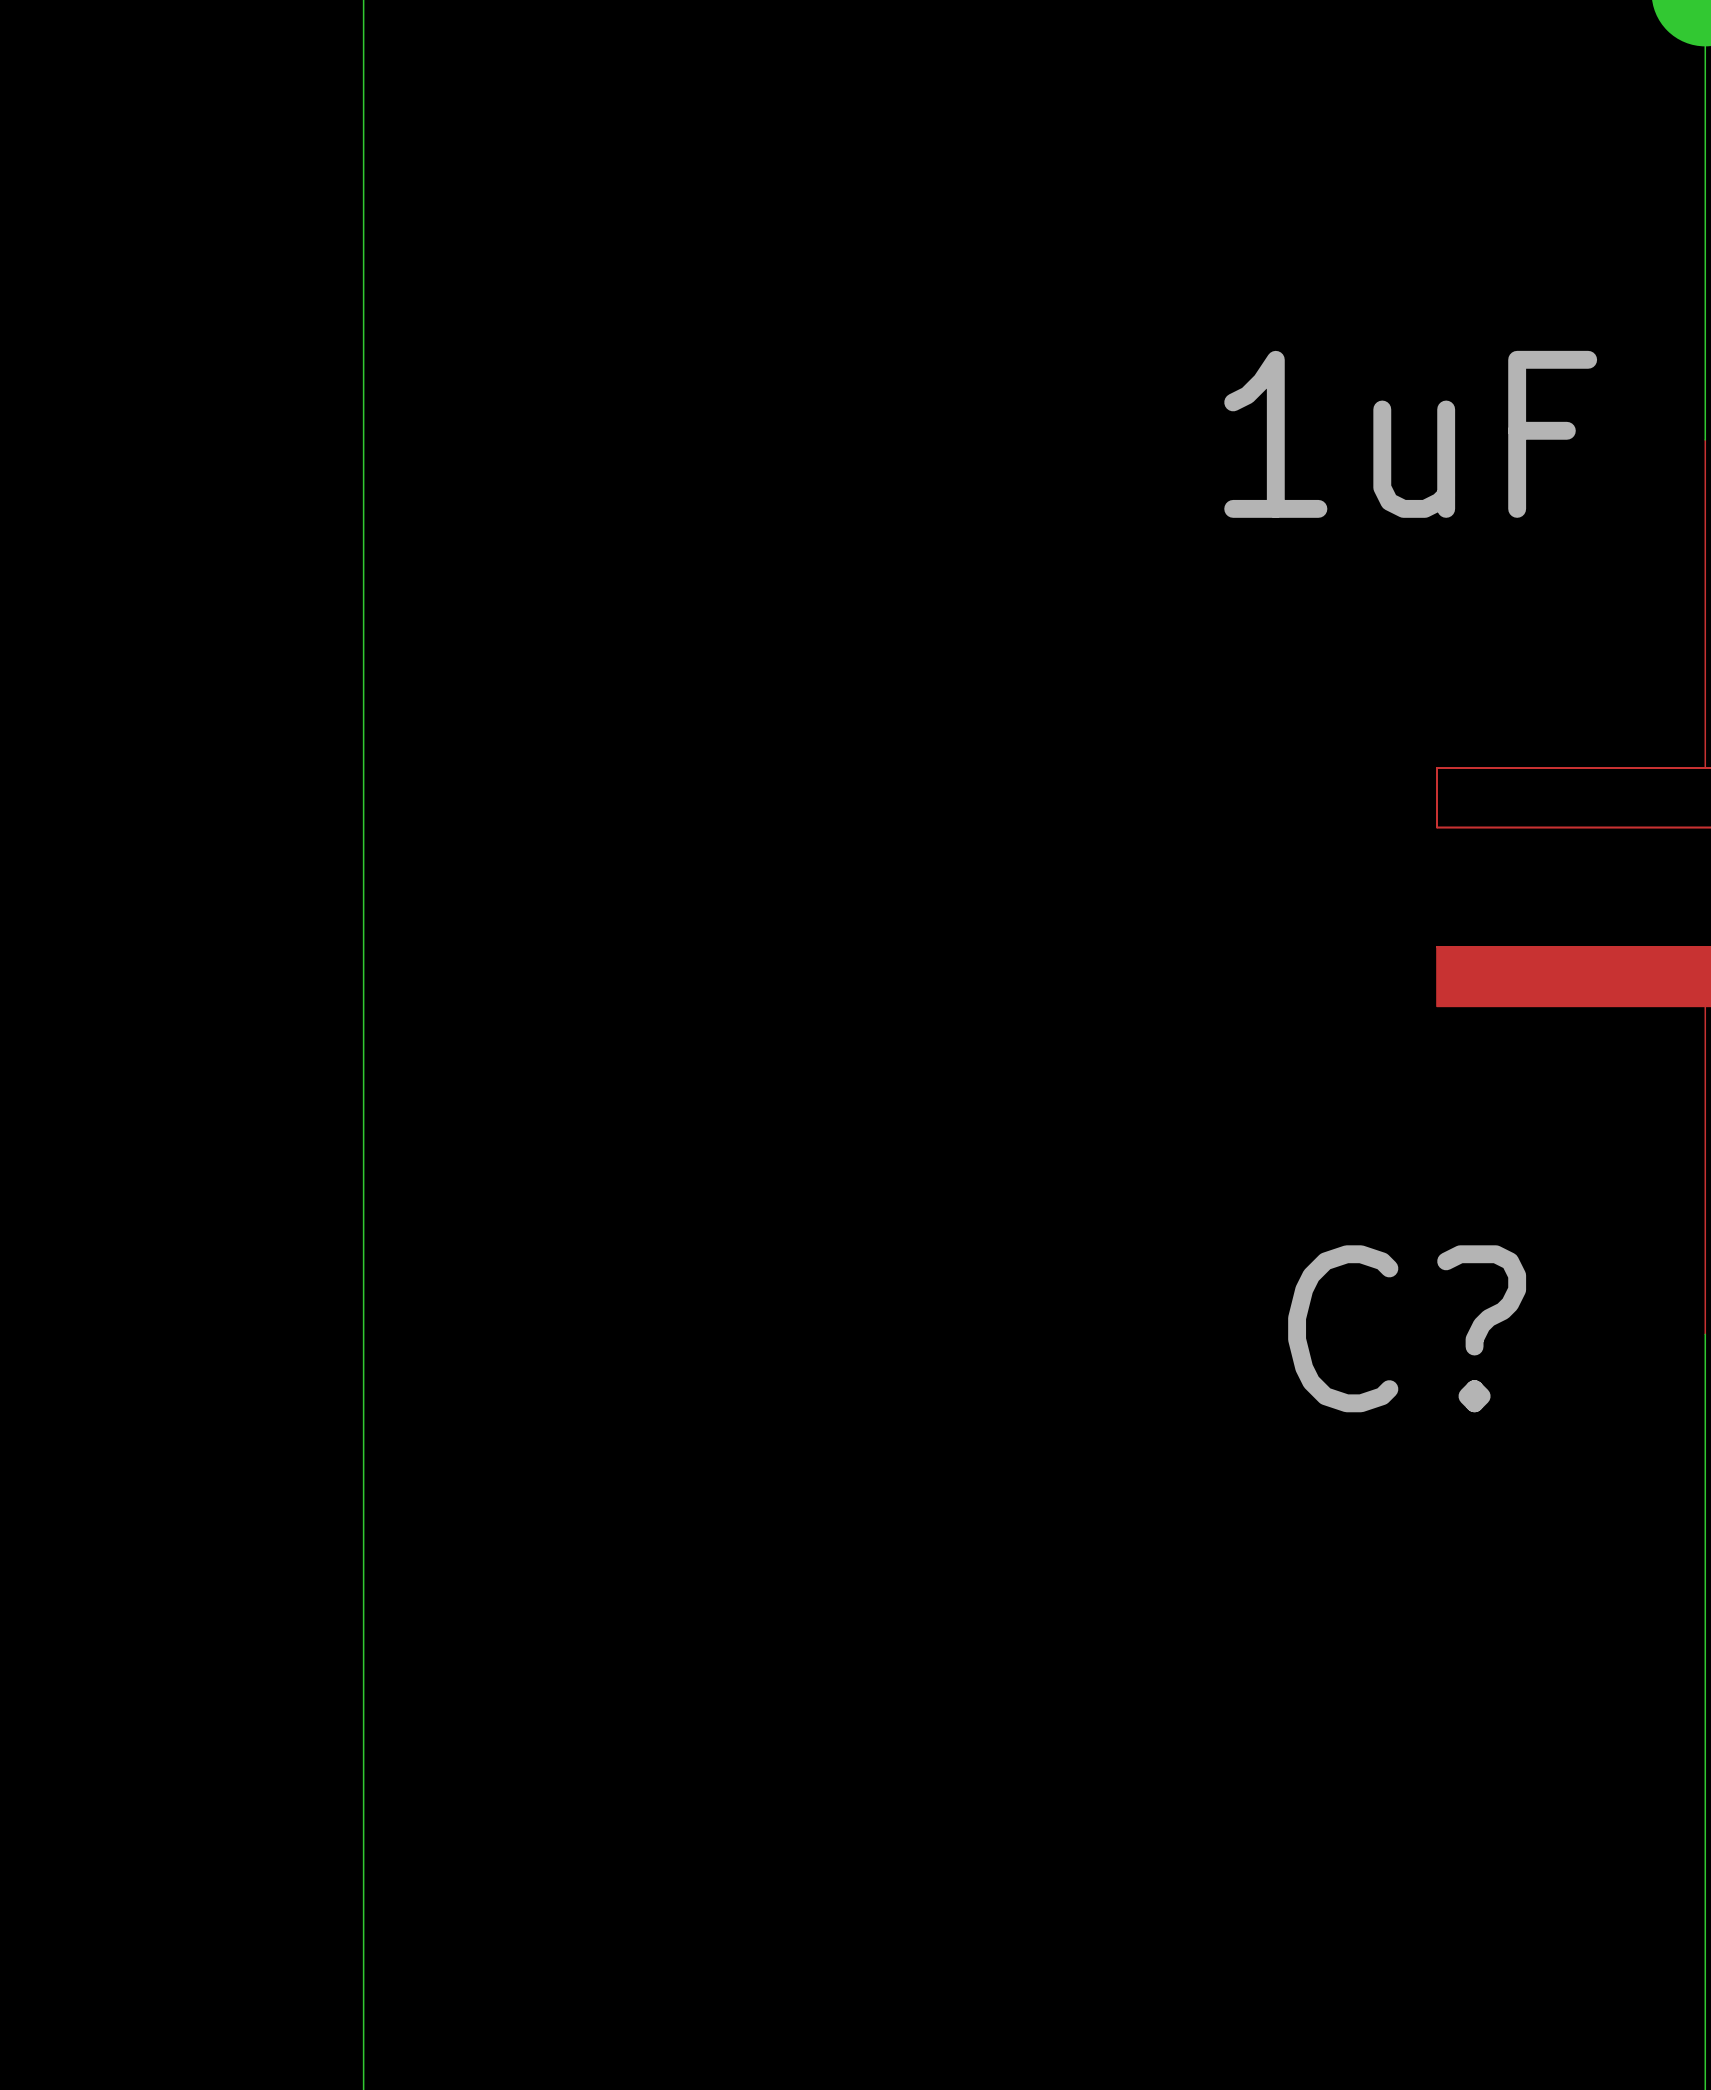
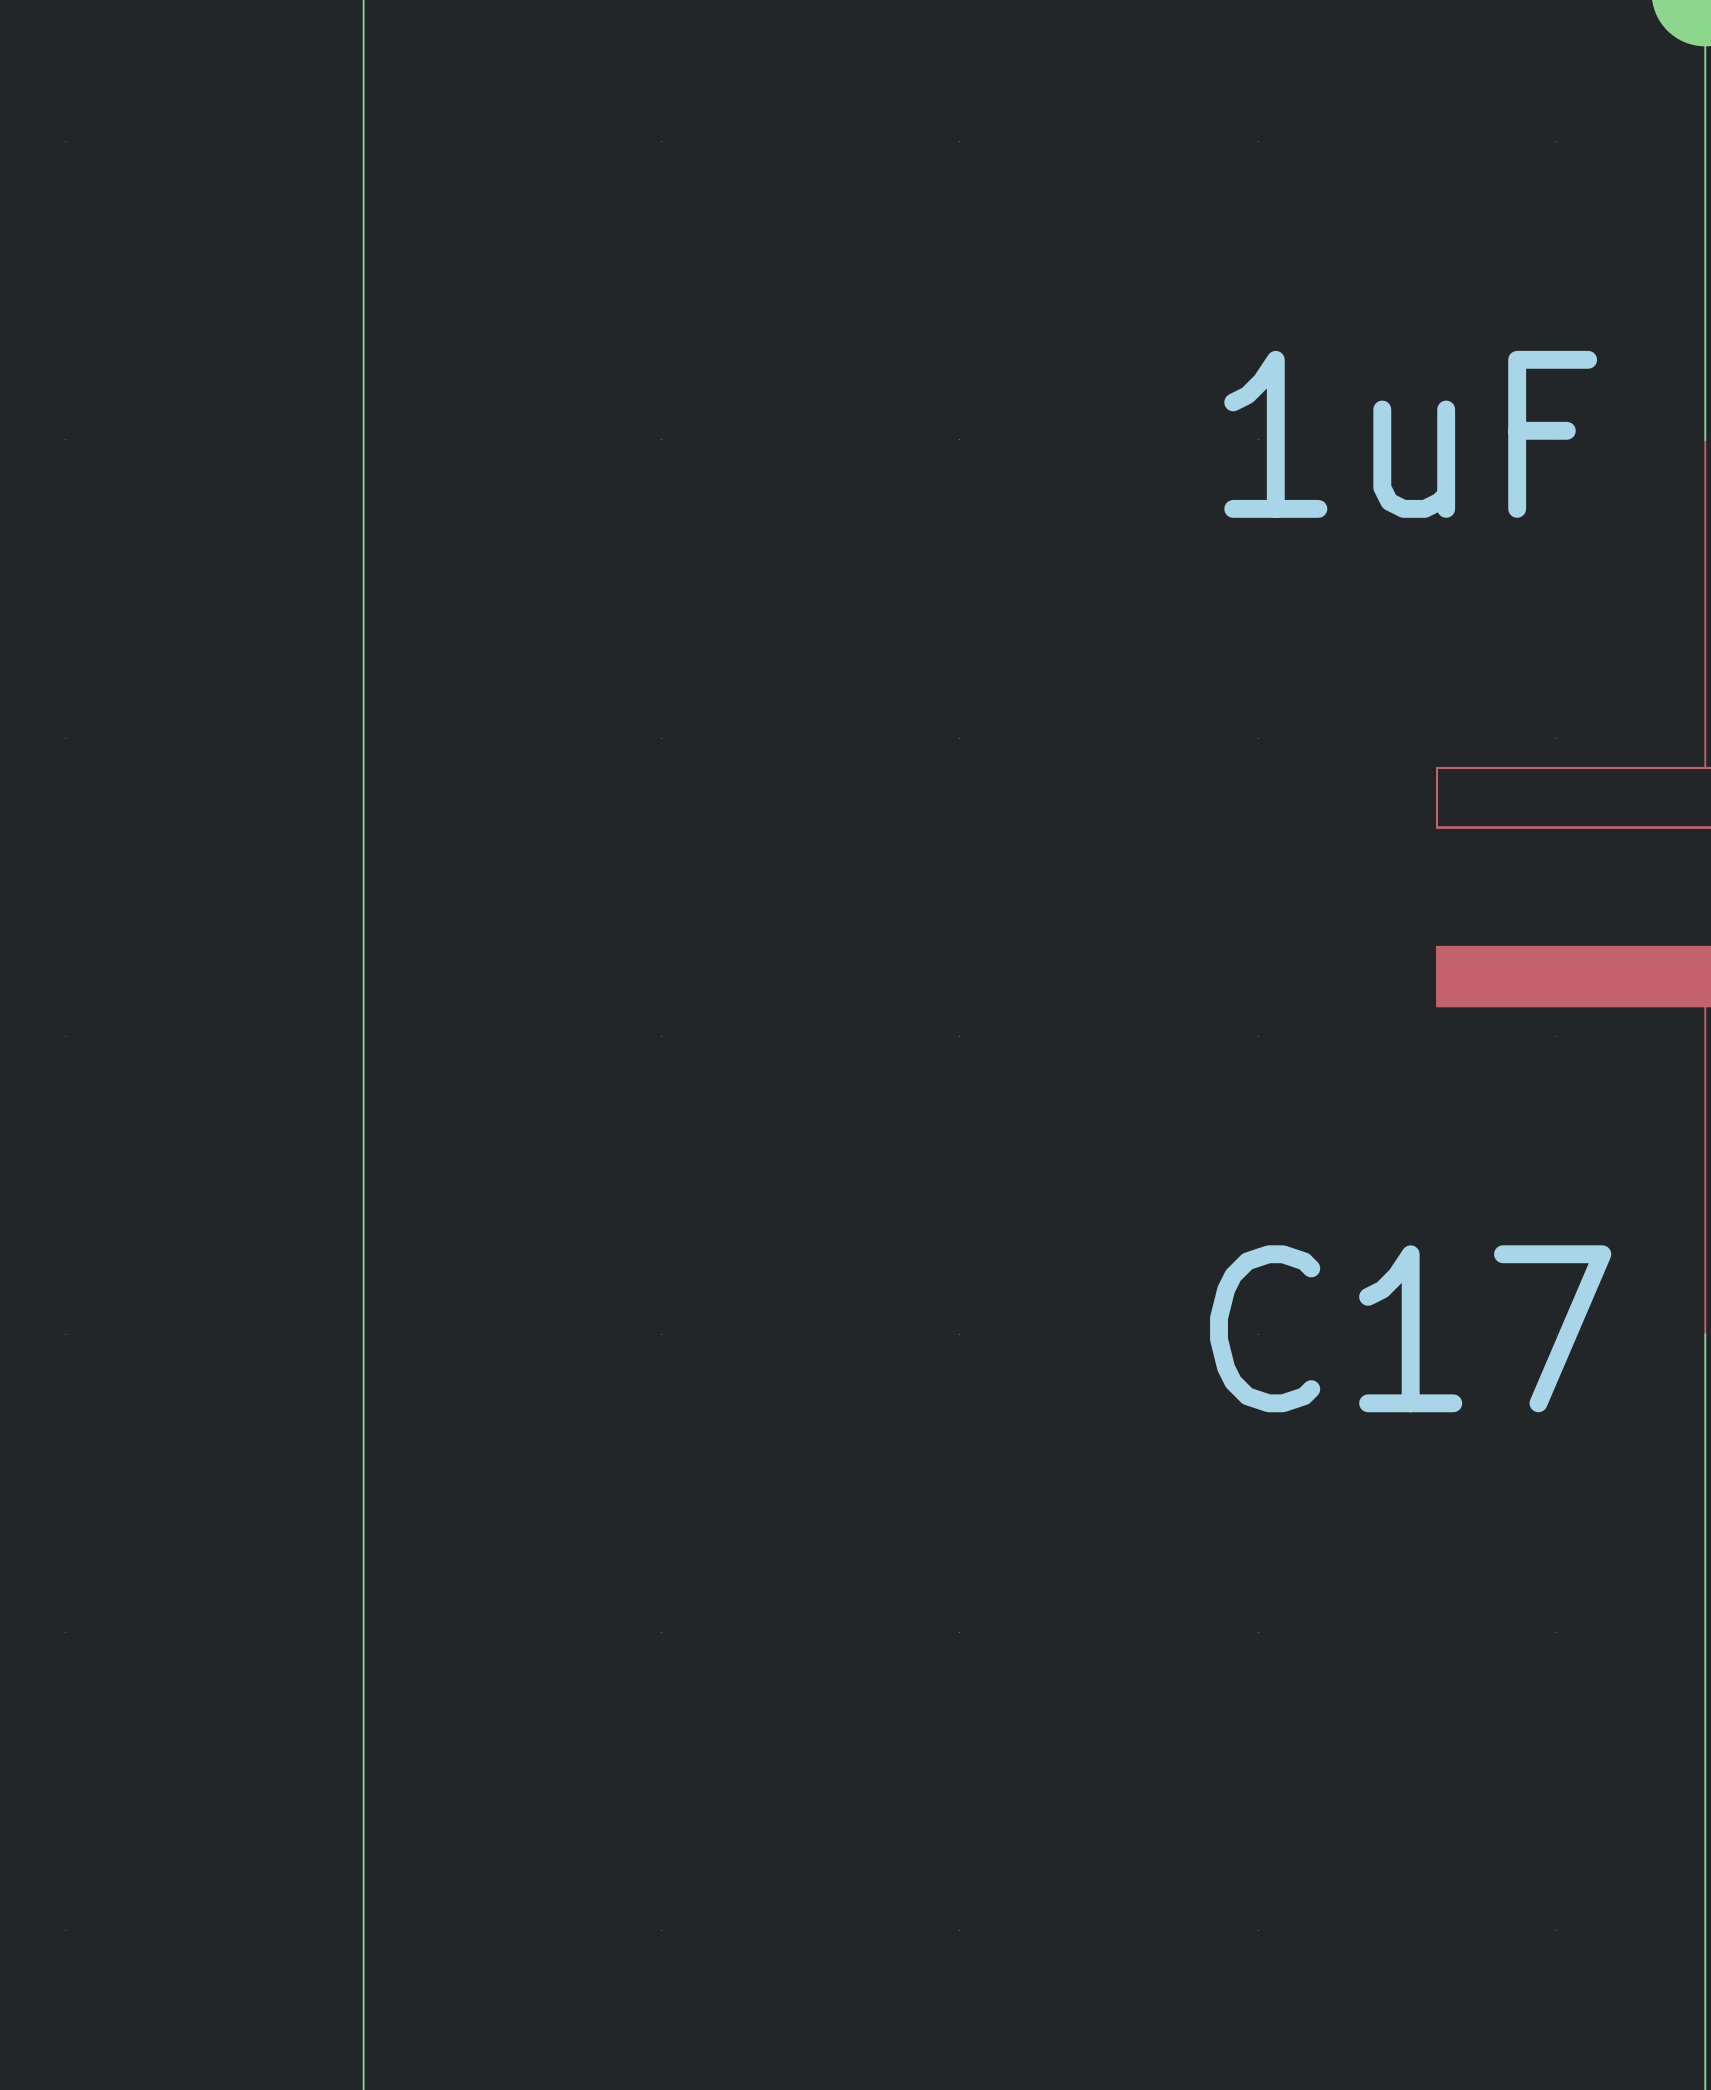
C? name: C? (1407, 1328) -> C17 (1410, 1328)

